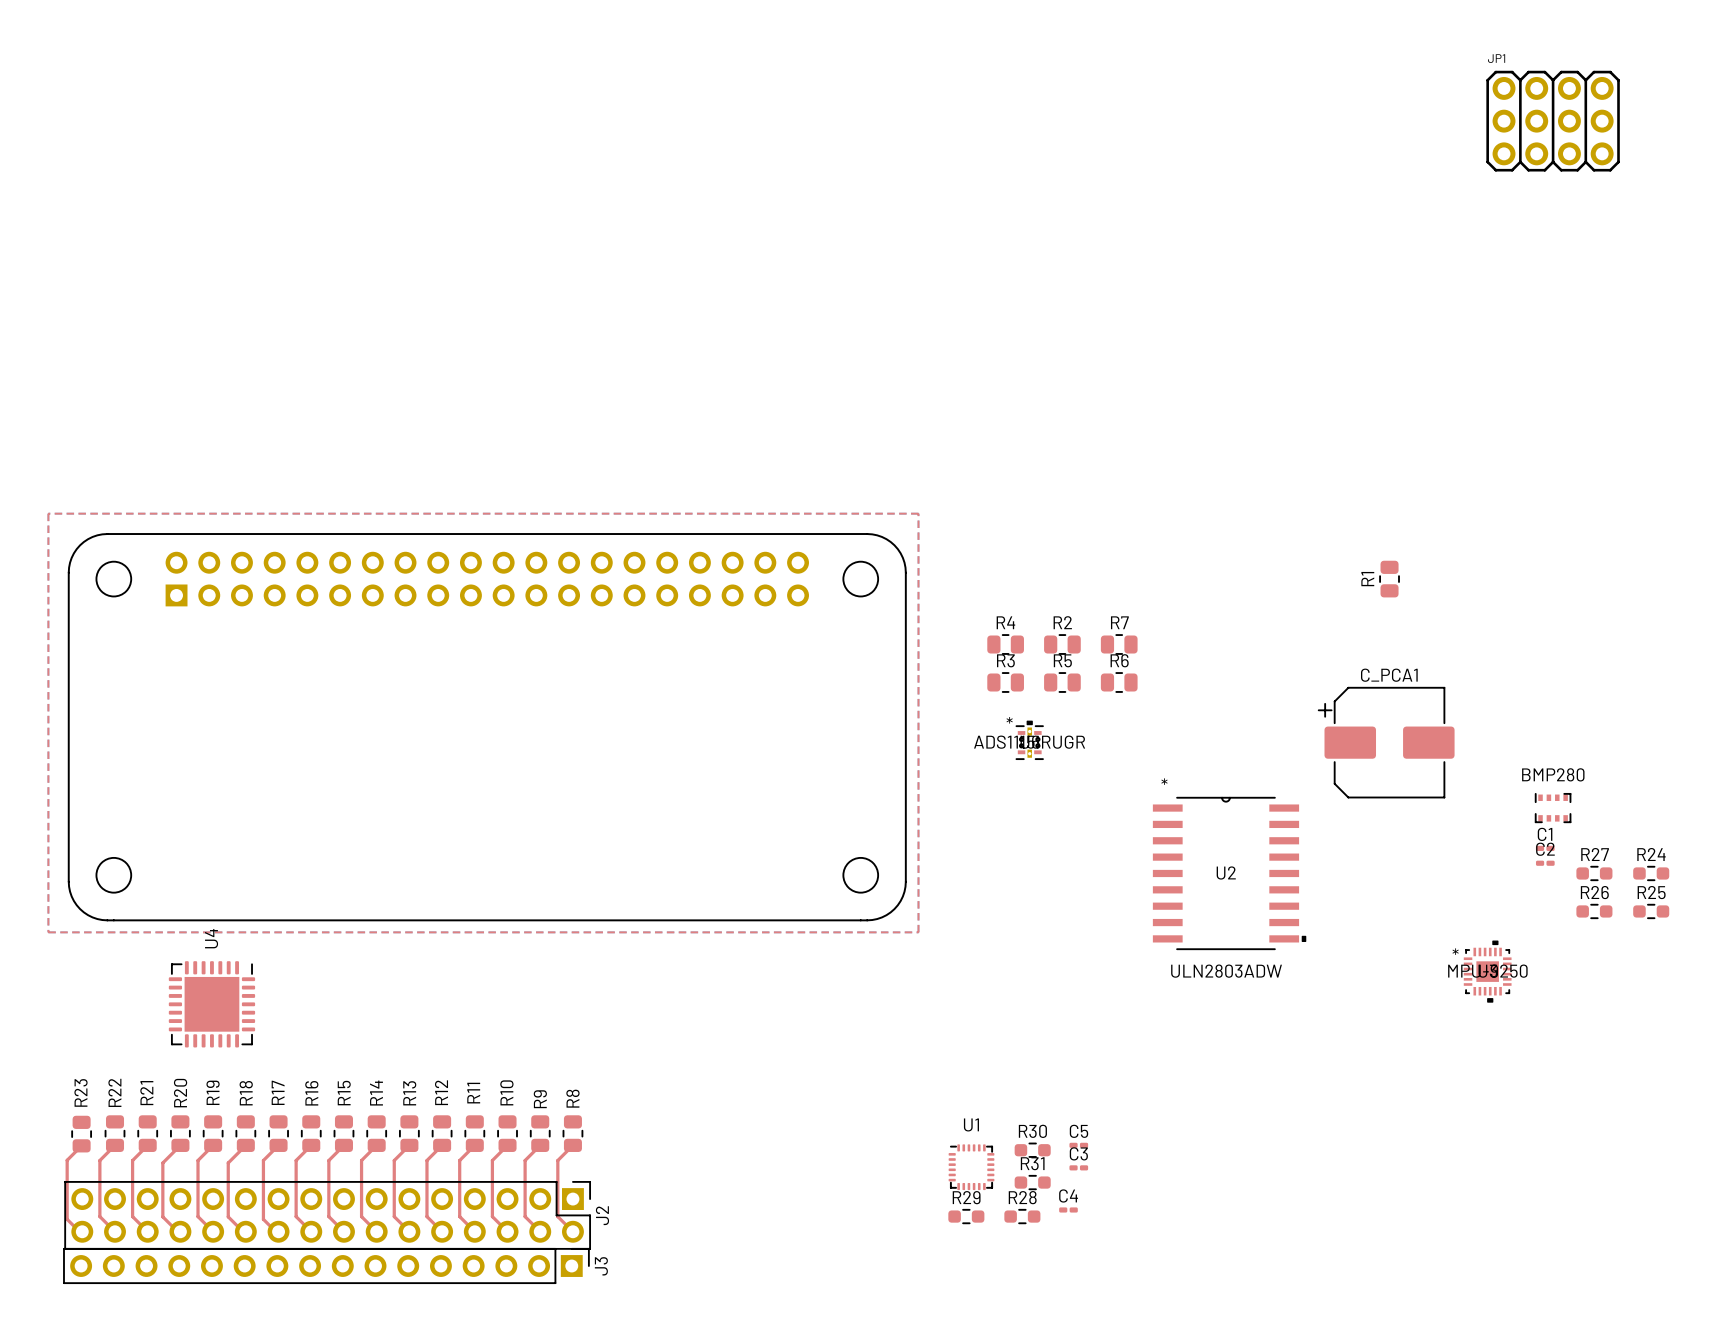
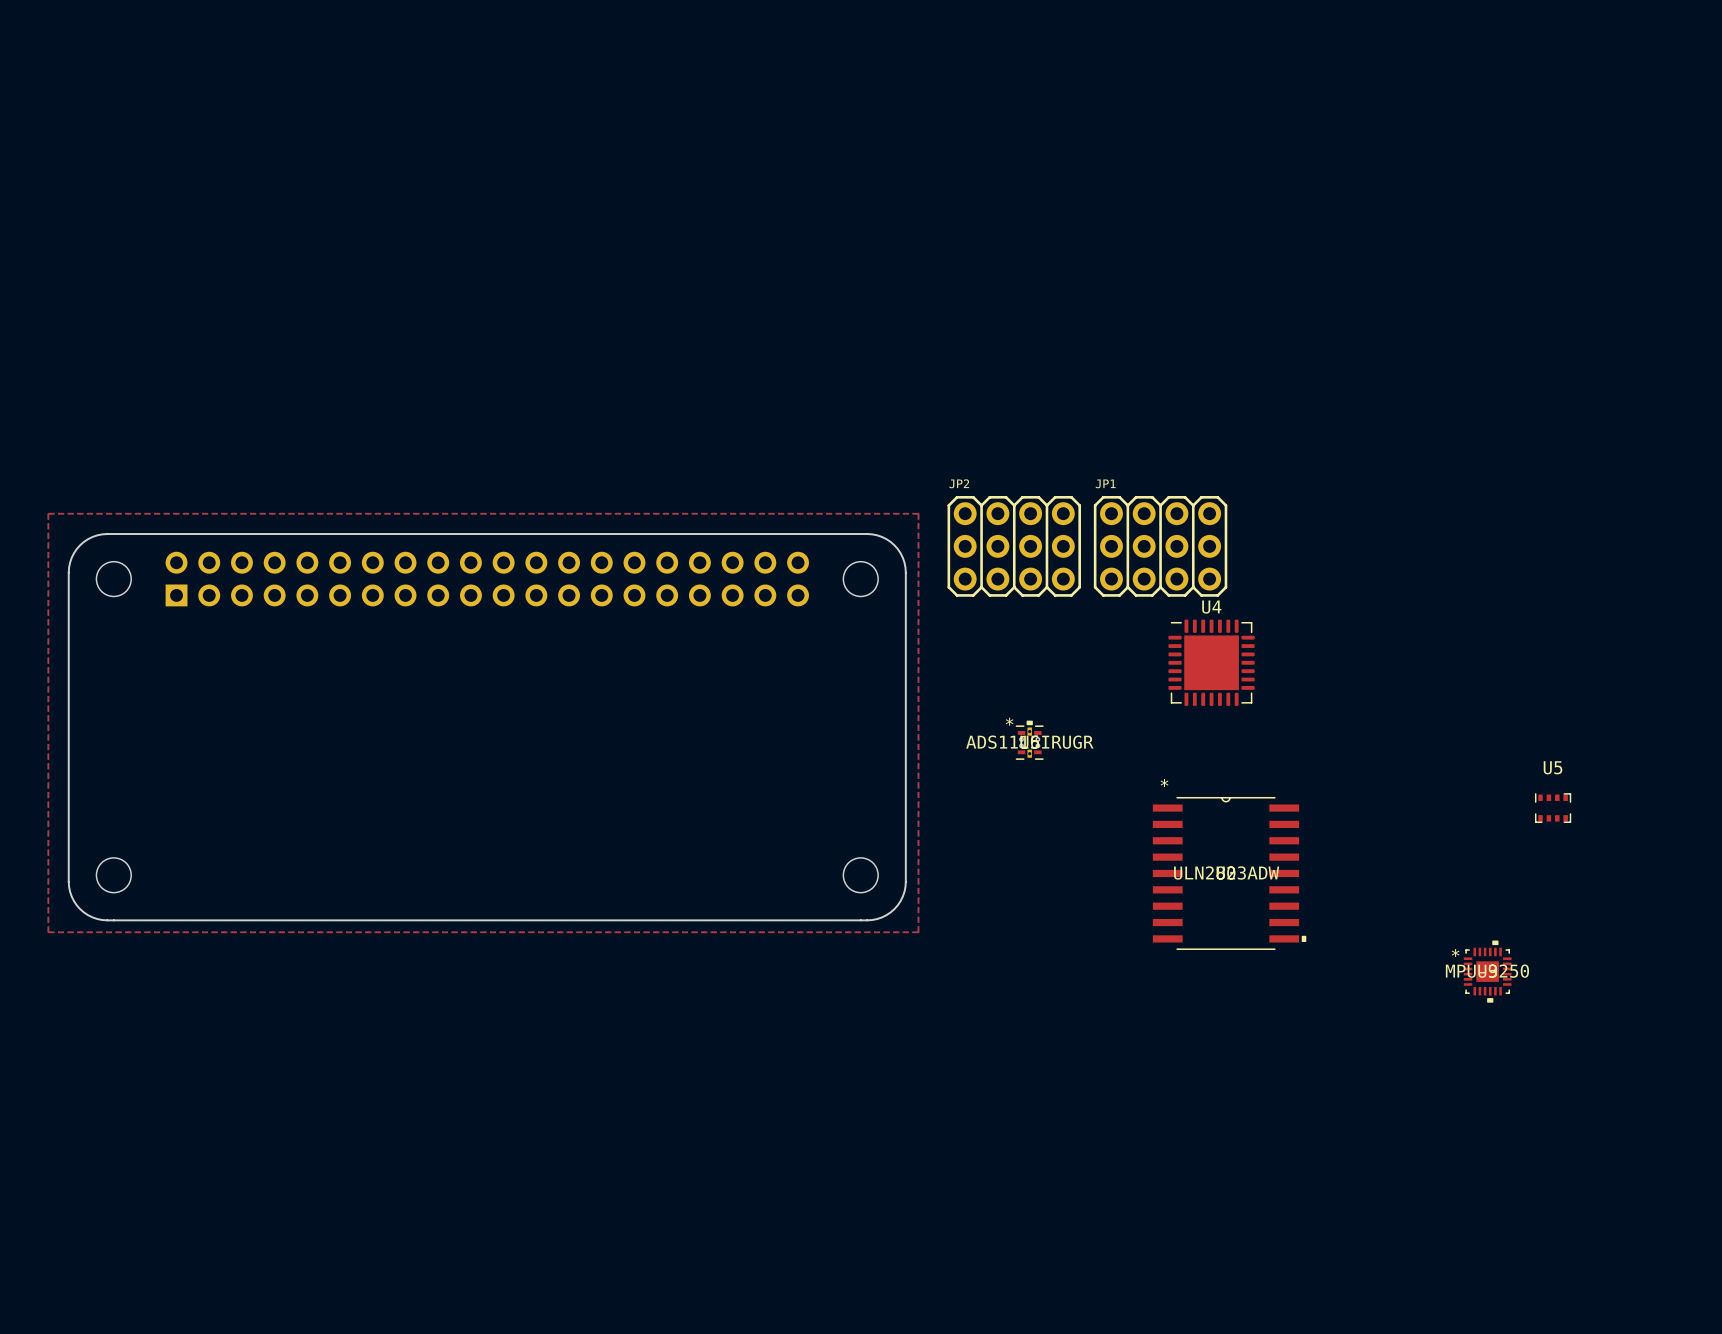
JP1 position: (1553, 121) -> (1160, 546)
JP2: none -> (1014, 546)
R1: (1389, 579) -> none
R4: (1005, 644) -> none
R2: (1062, 644) -> none
R7: (1119, 644) -> none
R3: (1005, 682) -> none
R5: (1062, 682) -> none
R6: (1119, 682) -> none
C_PCA1: (1386, 742) -> none
BMP280 name: BMP280 (1553, 774) -> U5 (1553, 767)
C1: (1545, 848) -> none
C2: (1545, 863) -> none
R27: (1594, 873) -> none
R24: (1651, 873) -> none
R26: (1594, 911) -> none
R25: (1651, 911) -> none
U2 value position: ULN2803ADW (1226, 971) -> ULN2803ADW (1226, 873)
U4 rotation: 0° (211, 1004) -> 90° counterclockwise (1211, 662)
U4 position: (211, 1004) -> (1211, 662)
R22: (115, 1133) -> none
R21: (147, 1133) -> none
R20: (180, 1133) -> none
R19: (213, 1133) -> none
R18: (245, 1133) -> none
R17: (278, 1133) -> none
R16: (311, 1133) -> none
R15: (343, 1133) -> none
R14: (376, 1133) -> none
R13: (409, 1133) -> none
R12: (442, 1133) -> none
R11: (474, 1133) -> none
R10: (507, 1133) -> none
R9: (540, 1133) -> none
R8: (572, 1133) -> none
R23: (81, 1134) -> none
top track: (81, 1145) (67, 1160) (67, 1219) (81, 1233) -> none
top track: (115, 1145) (99, 1160) (99, 1216) (115, 1231) -> none
top track: (147, 1145) (132, 1160) (132, 1216) (147, 1231) -> none
top track: (180, 1145) (162, 1162) (162, 1216) (179, 1233) (180, 1231) -> none
top track: (213, 1145) (198, 1160) (198, 1216) (213, 1231) -> none
top track: (245, 1145) (228, 1162) (228, 1216) (244, 1233) -> none
top track: (278, 1145) (263, 1160) (263, 1219) (277, 1233) -> none
top track: (311, 1145) (296, 1160) (296, 1216) (311, 1231) -> none
top track: (343, 1145) (328, 1160) (328, 1216) (343, 1231) -> none
top track: (376, 1145) (361, 1160) (361, 1216) (376, 1231) -> none
top track: (409, 1145) (394, 1160) (394, 1216) (409, 1231) -> none
top track: (442, 1145) (426, 1160) (426, 1216) (442, 1231) -> none
top track: (474, 1145) (459, 1160) (459, 1216) (474, 1231) -> none
top track: (507, 1145) (492, 1160) (492, 1216) (507, 1231) -> none
top track: (540, 1145) (525, 1160) (525, 1216) (540, 1231) -> none
top track: (572, 1145) (557, 1160) (557, 1216) (572, 1231) -> none
C5: (1078, 1145) -> none
R30: (1032, 1150) -> none
U1: (971, 1167) -> none
C3: (1078, 1167) -> none
R31: (1032, 1182) -> none
C4: (1068, 1209) -> none
J2: (327, 1215) -> none
R29: (966, 1216) -> none
R28: (1022, 1216) -> none
J3: (326, 1266) -> none

